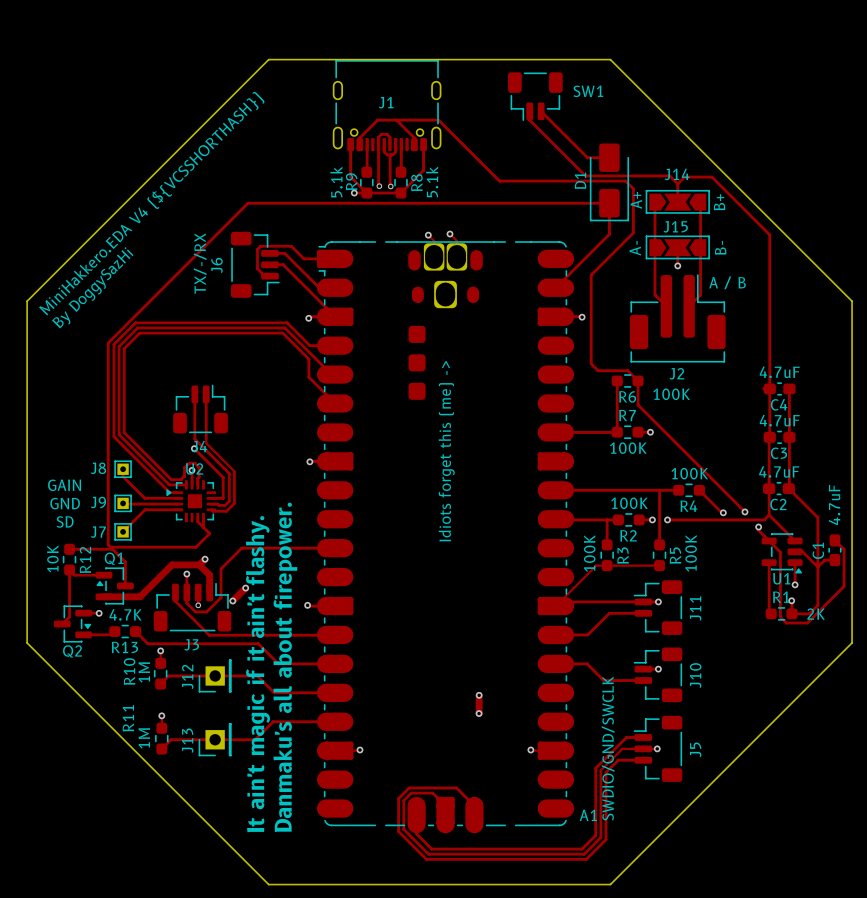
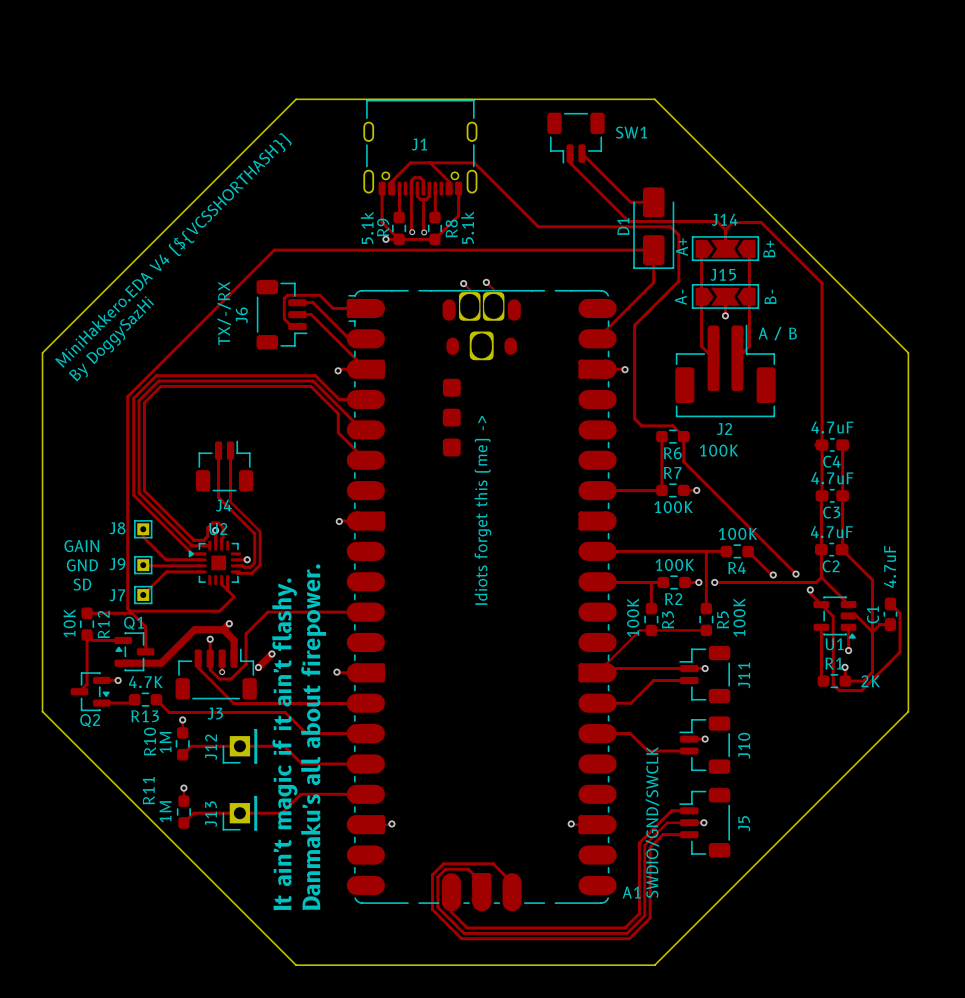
track: (194, 448) (223, 477) (222, 498) -> none
via position: (194, 448) -> (247, 559)
track: (479, 695) (479, 713) -> none
via: (479, 695) -> none
via: (479, 713) -> none

